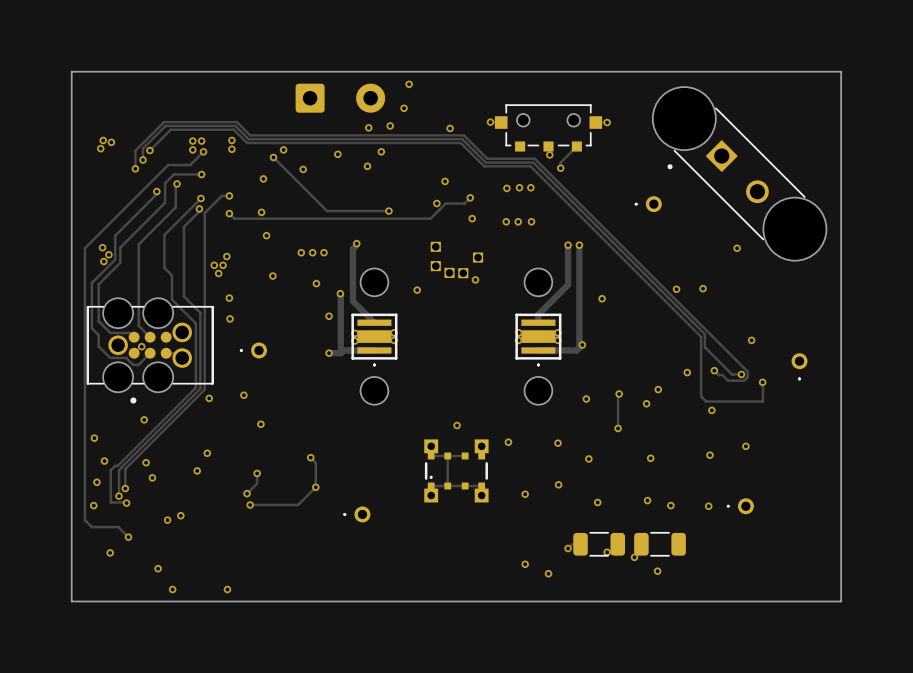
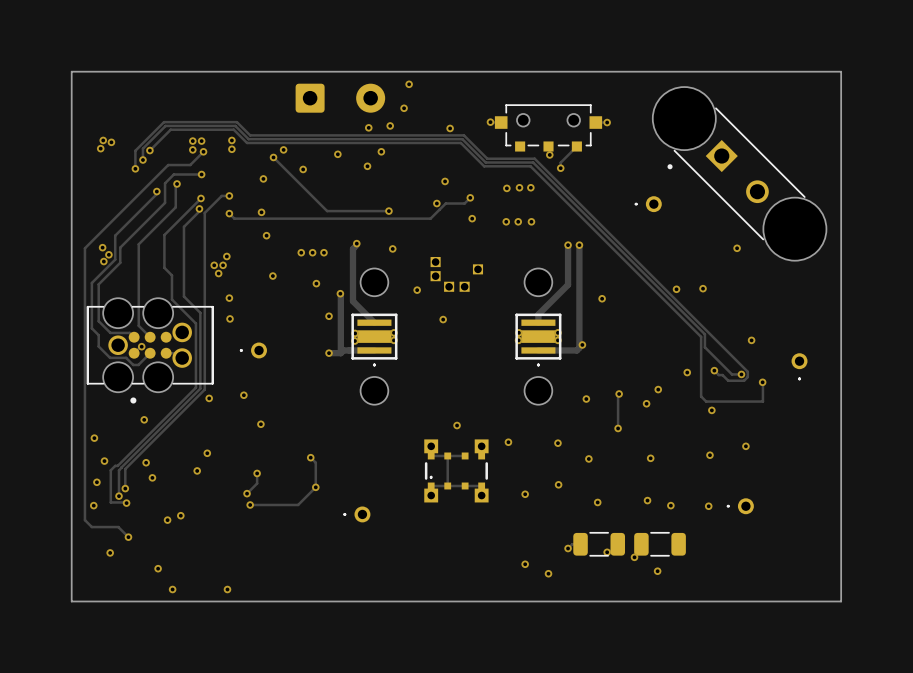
via: none -> (392, 248)
part: (456, 260) -> none
part: none -> (456, 274)
via: (475, 279) -> none
via: none -> (443, 319)

